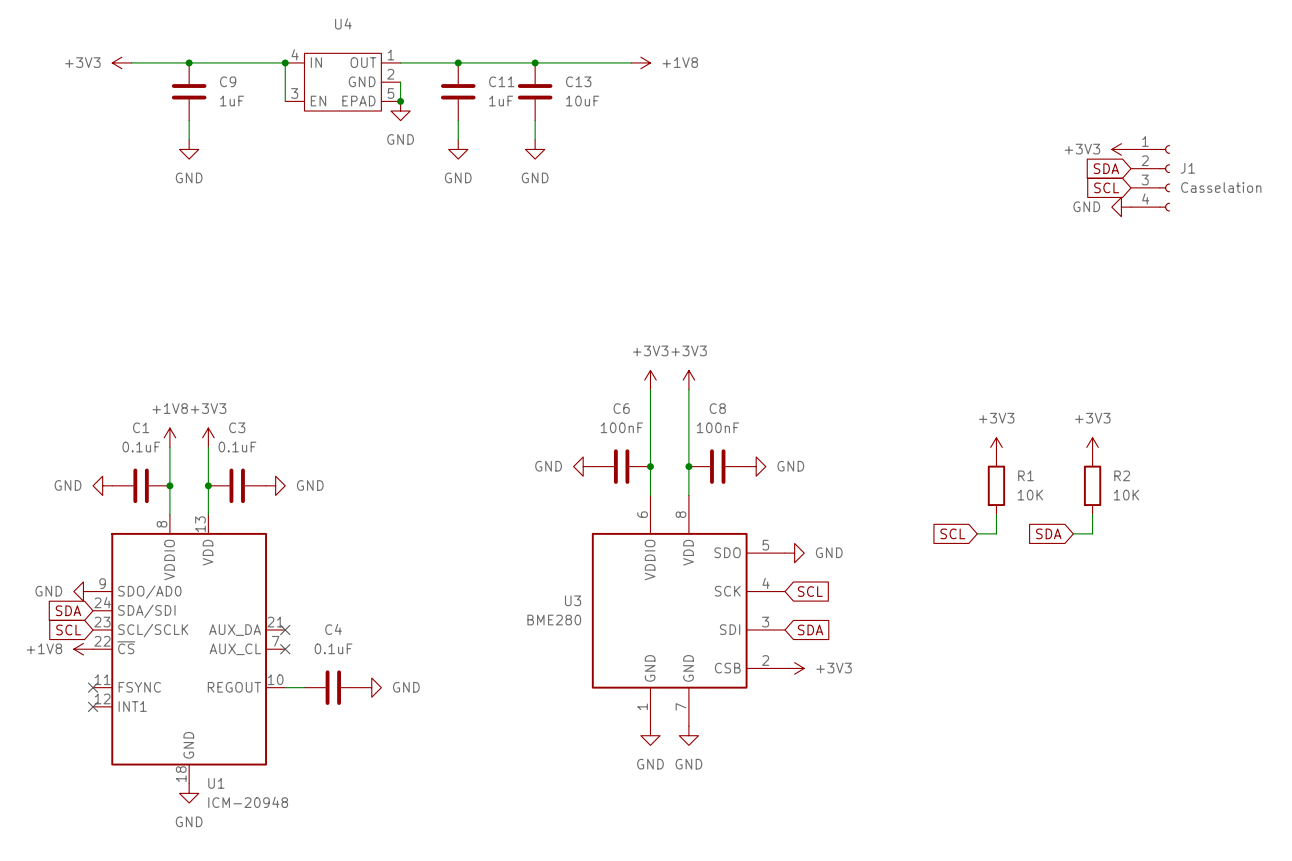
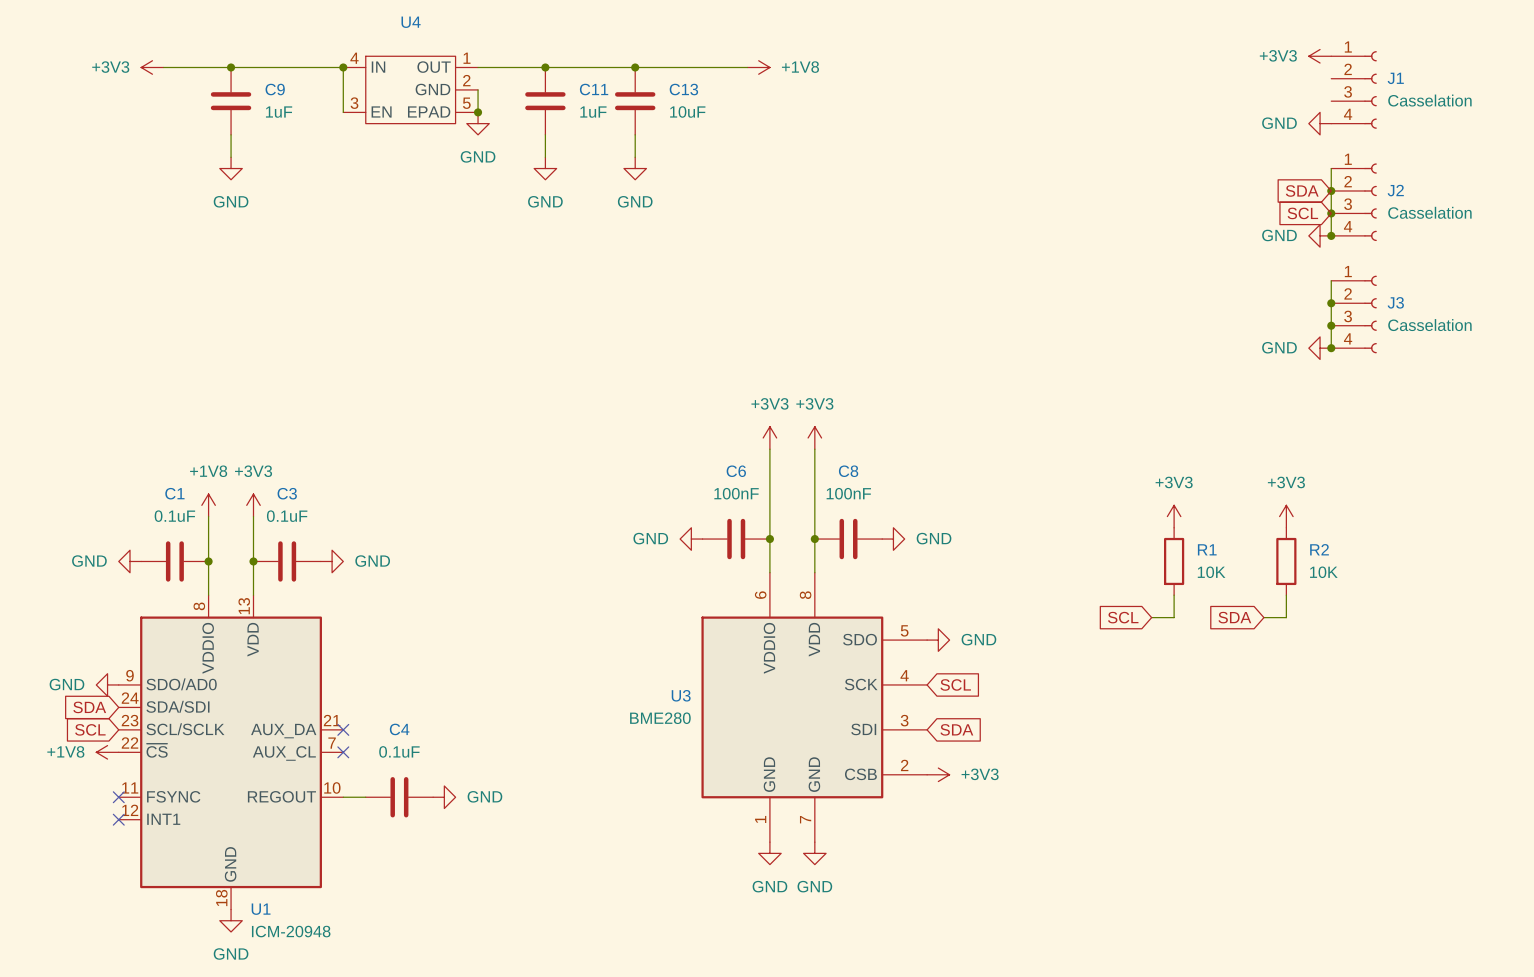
J1: none -> Casselation (1354, 89)
power symbol: none -> GND (1320, 123)
power symbol position: +3V3 (1121, 149) -> +3V3 (1320, 56)
wire: none -> (1331, 168) (1331, 235)
junction: none -> (1331, 190)
J1 name: J1 (1187, 168) -> J2 (1395, 190)
junction: none -> (1331, 213)
junction: none -> (1331, 235)
wire: none -> (1331, 280) (1331, 348)
junction: none -> (1331, 303)
J3: none -> Casselation (1354, 314)
junction: none -> (1331, 325)
power symbol: none -> GND (1320, 348)
junction: none -> (1331, 348)

